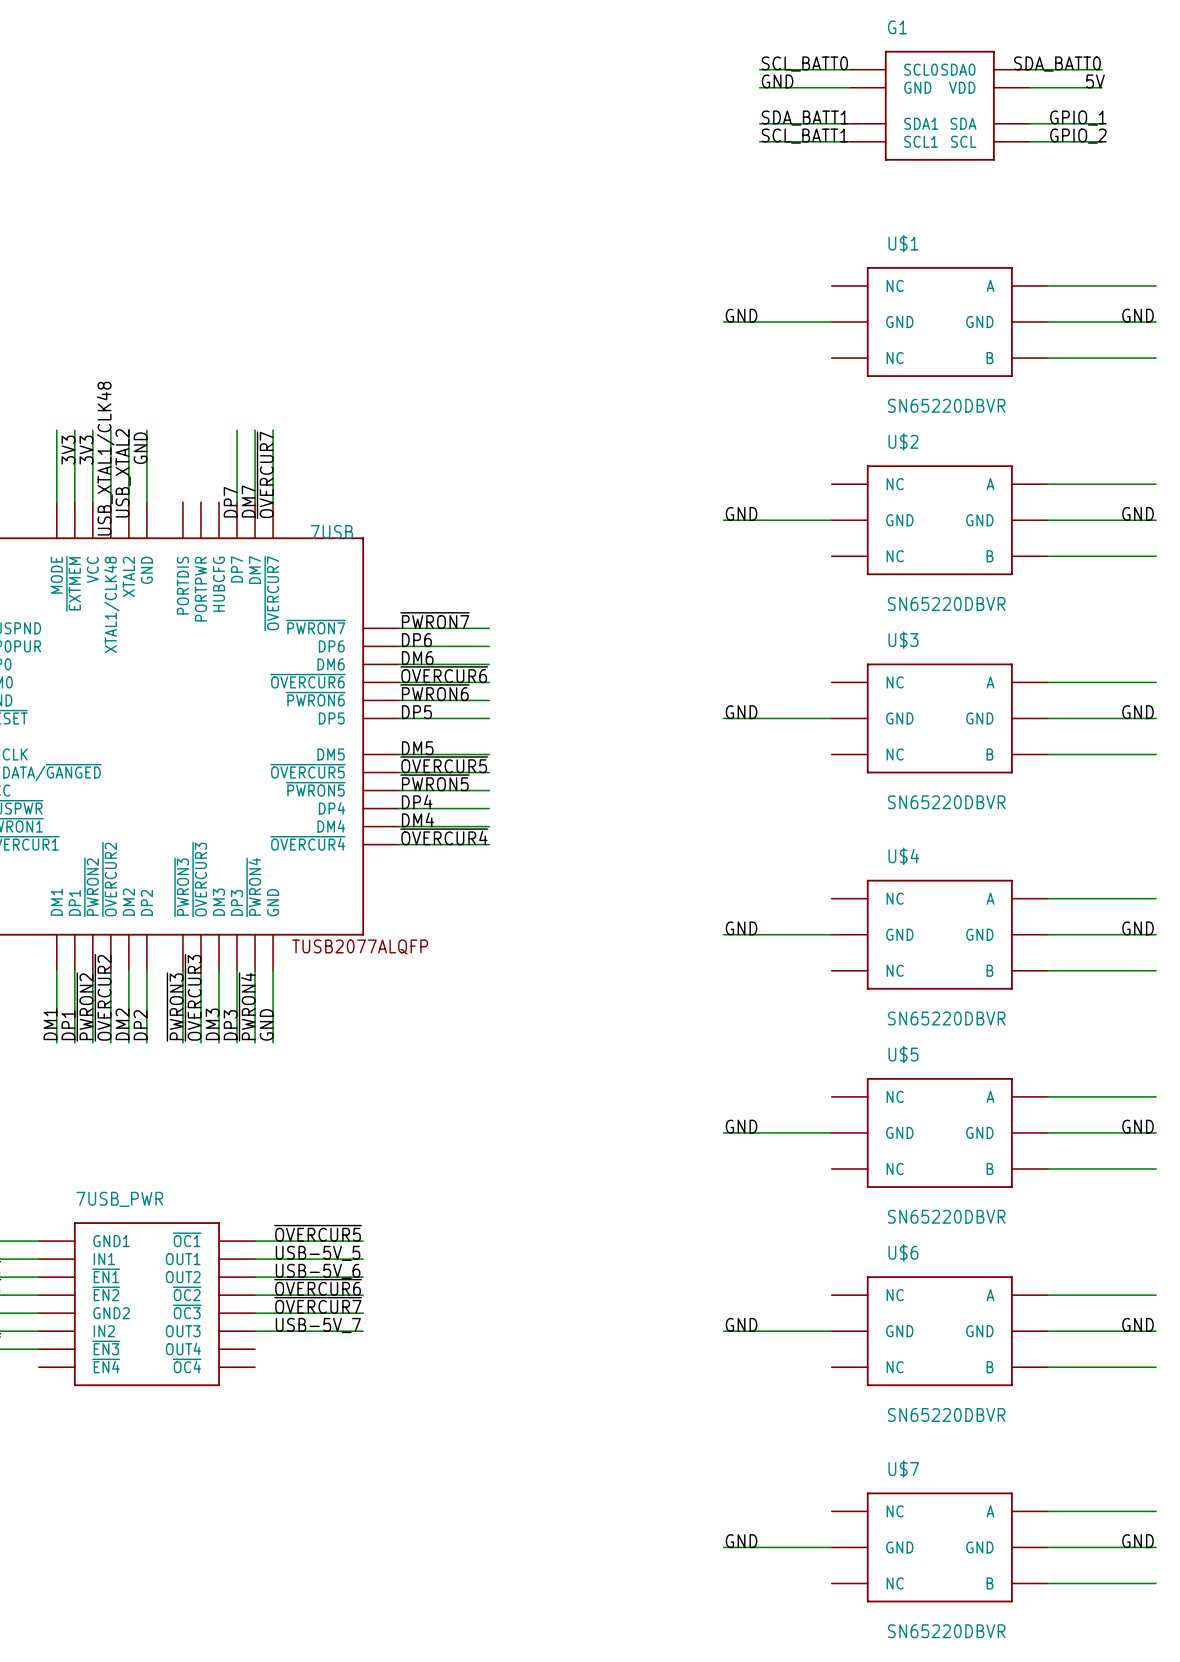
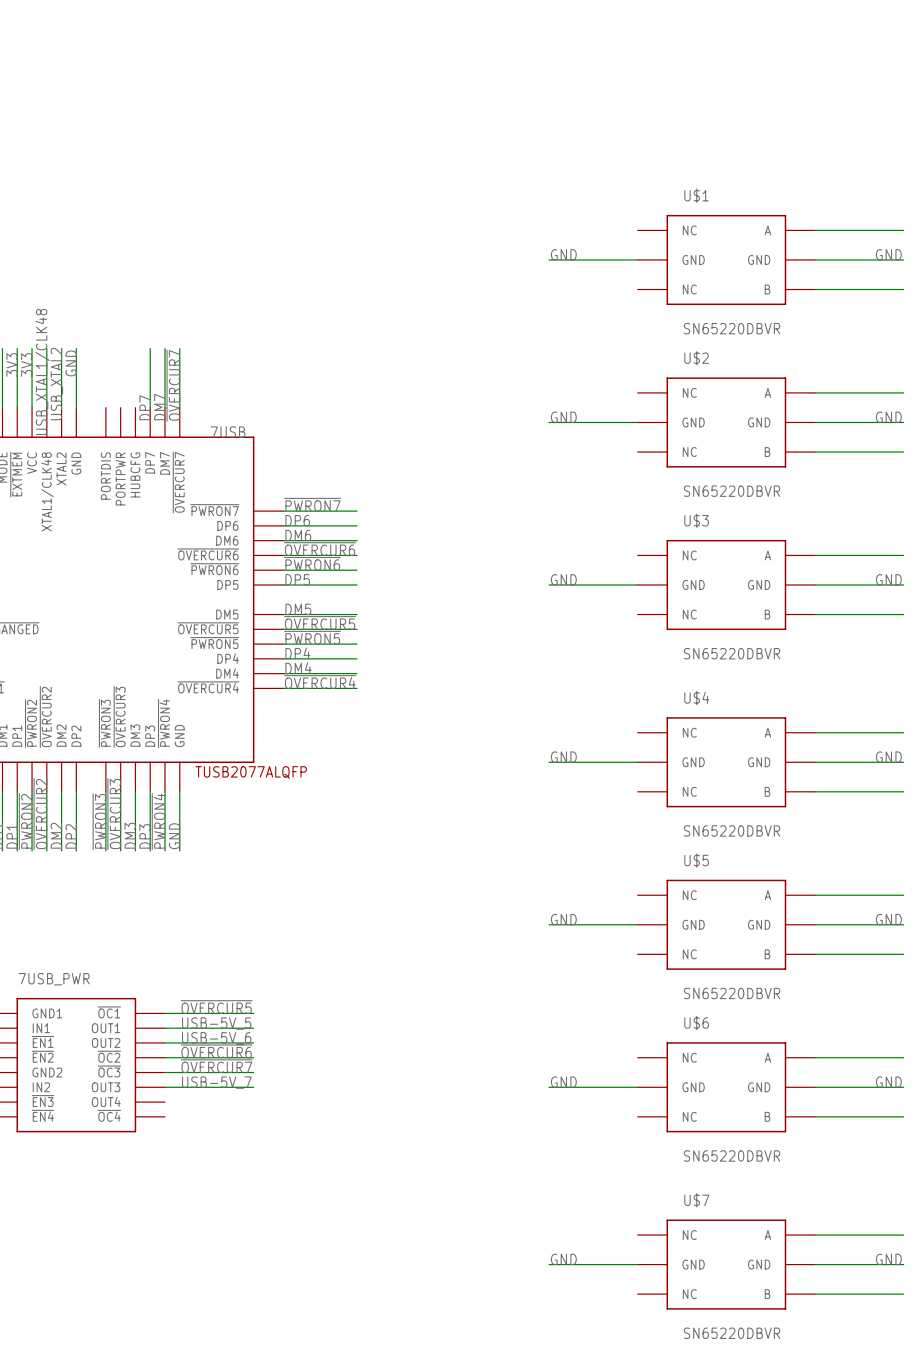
label: SCL_BATT0 (804, 64) -> none
label: SDA_BATT0 (1057, 64) -> none
wire: (759, 69) (849, 69) -> none
wire: (1029, 69) (1102, 69) -> none
label: GND (777, 81) -> none
label: 5V (1095, 81) -> none
wire: (759, 87) (849, 87) -> none
wire: (1029, 87) (1102, 87) -> none
G1: (939, 105) -> none
label: SDA_BATT1 (805, 118) -> none
label: GPIO_1 (1078, 118) -> none
wire: (759, 123) (849, 123) -> none
wire: (1029, 123) (1102, 123) -> none
label: SCL_BATT1 (804, 136) -> none
label: GPIO_2 (1078, 136) -> none
wire: (759, 141) (849, 141) -> none
wire: (1029, 141) (1102, 141) -> none

